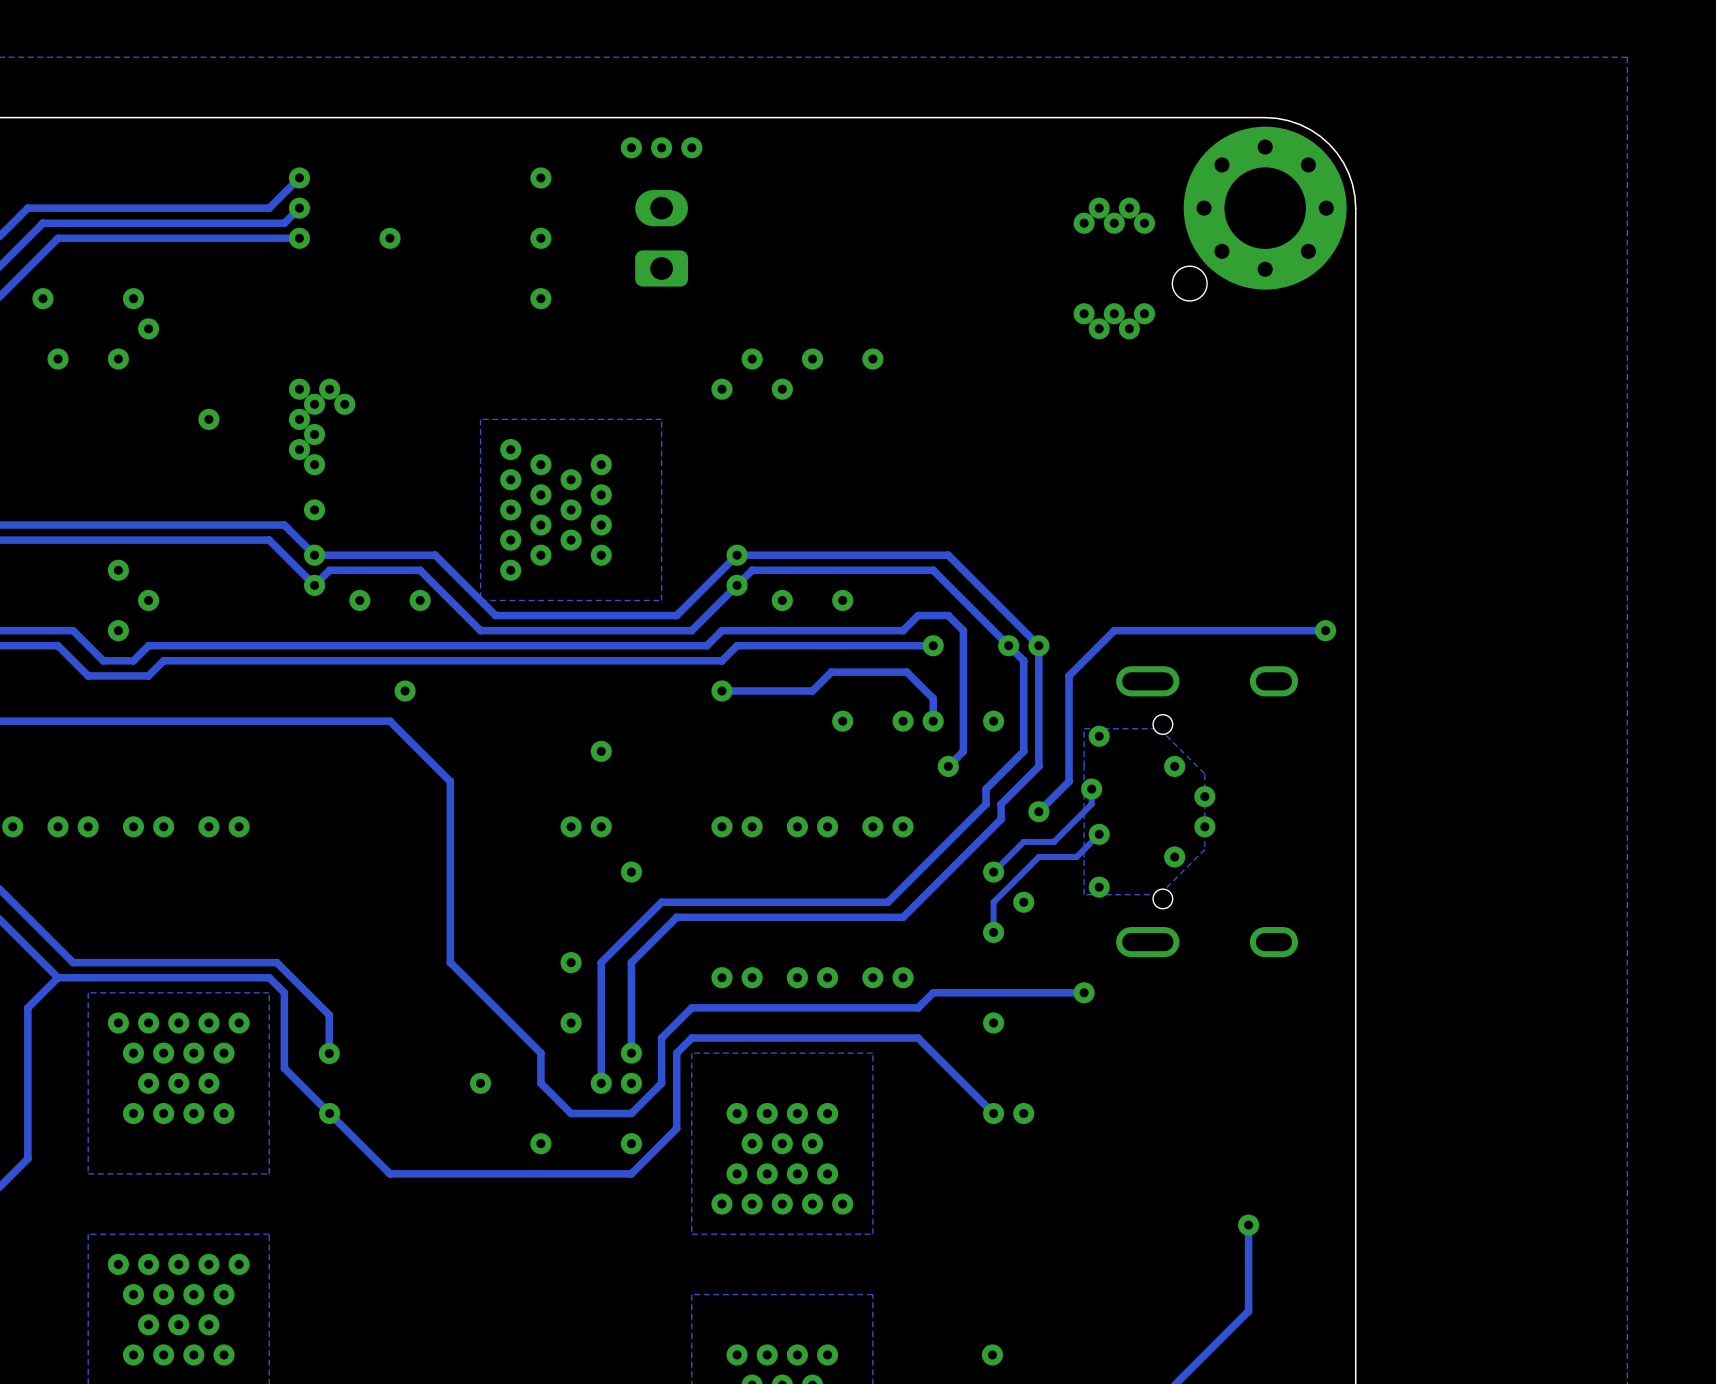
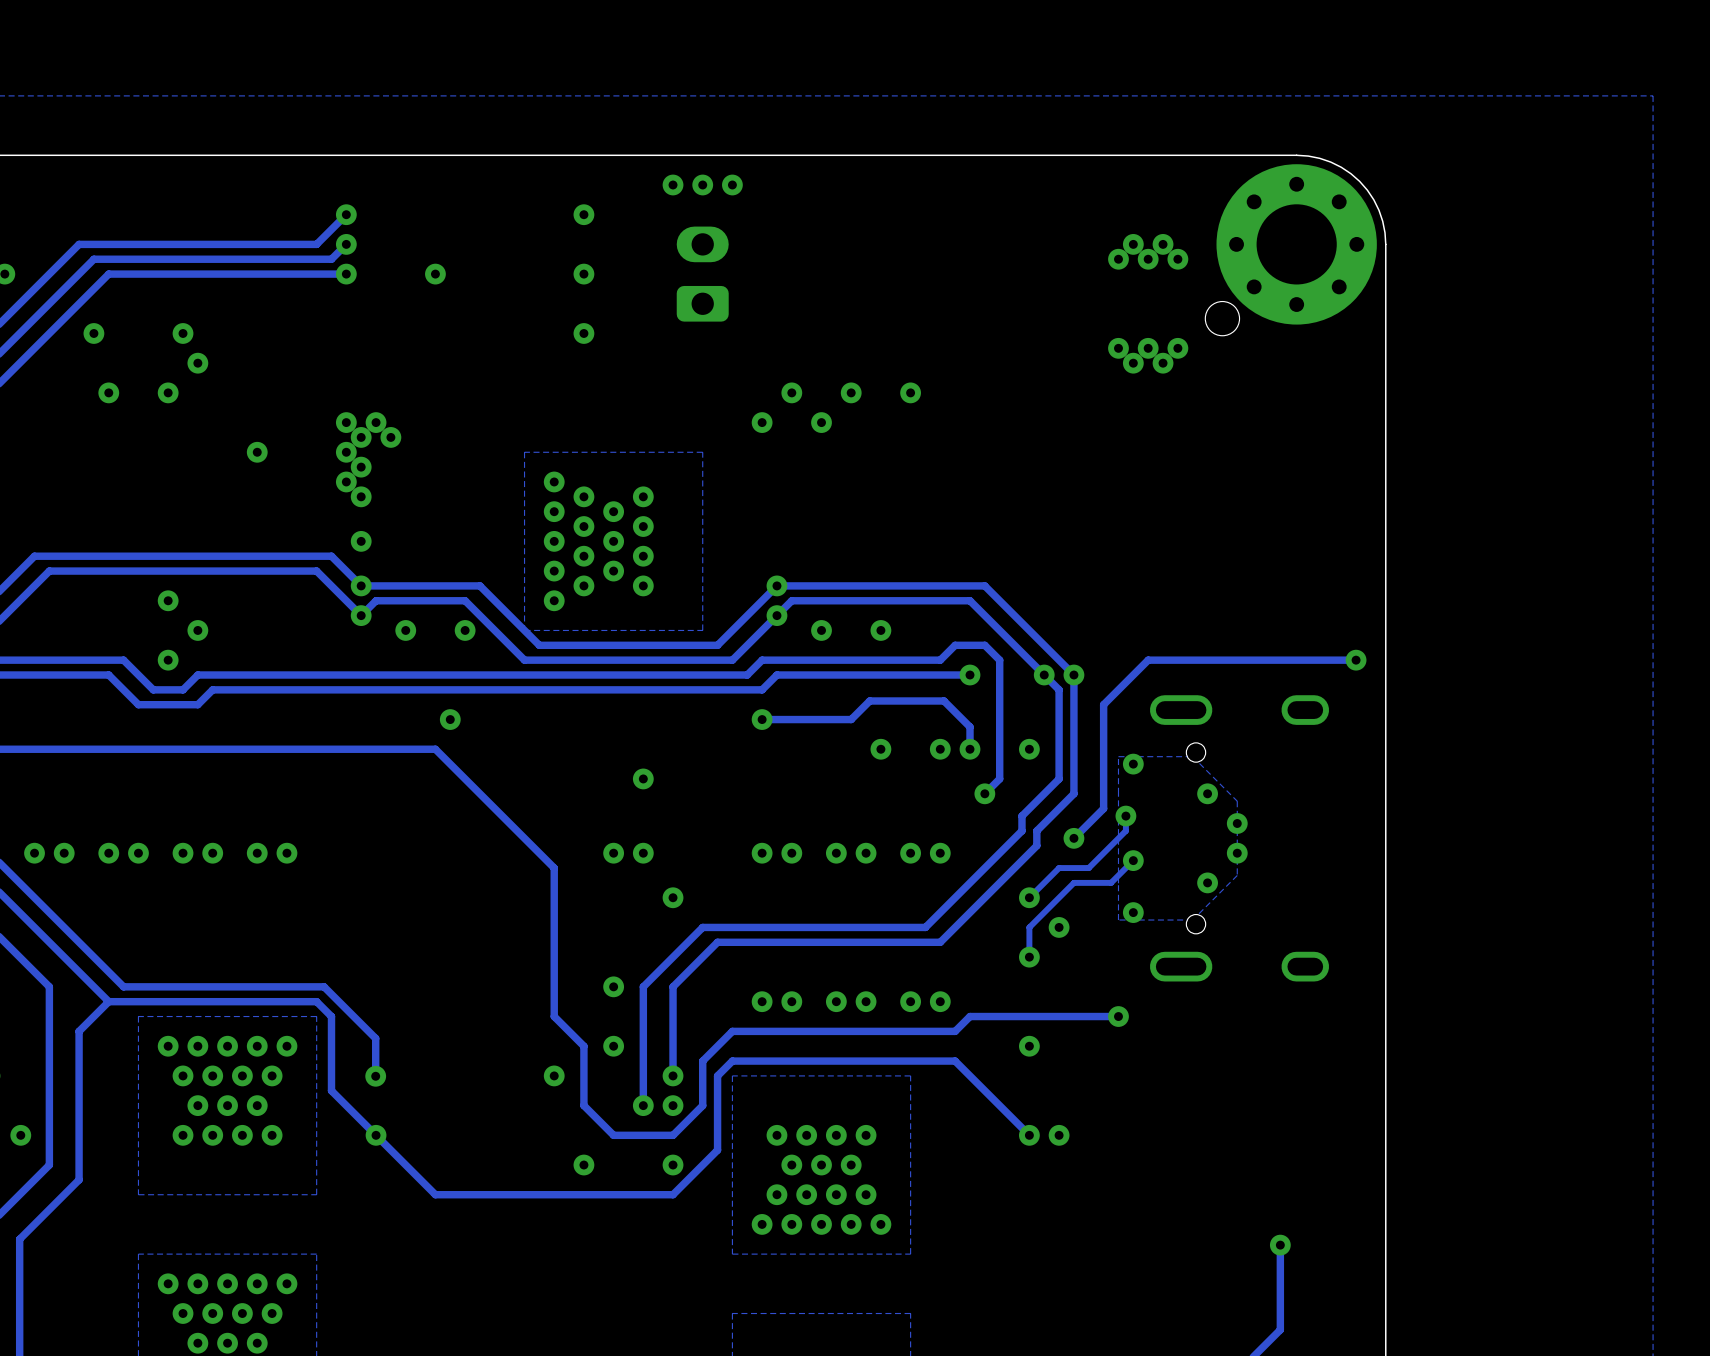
track: (450, 781) (450, 962) (540, 1053) -> (494, 808) (554, 868) (554, 1016) (583, 1046) (583, 1075)
via position: (480, 1083) -> (554, 1075)

